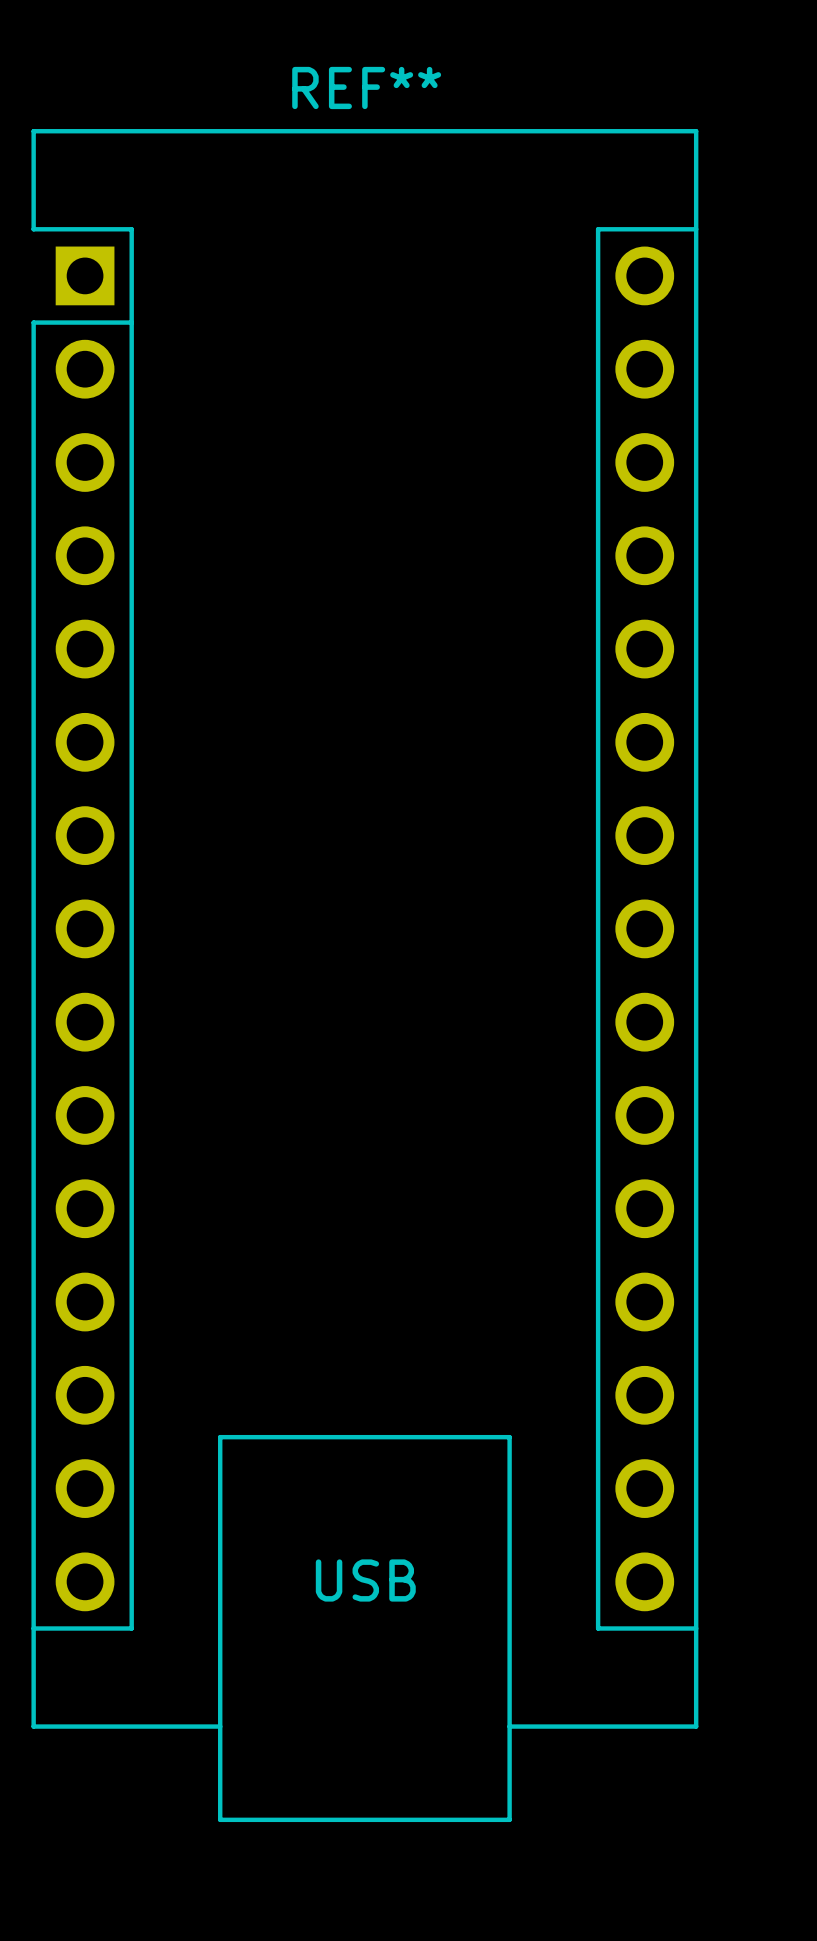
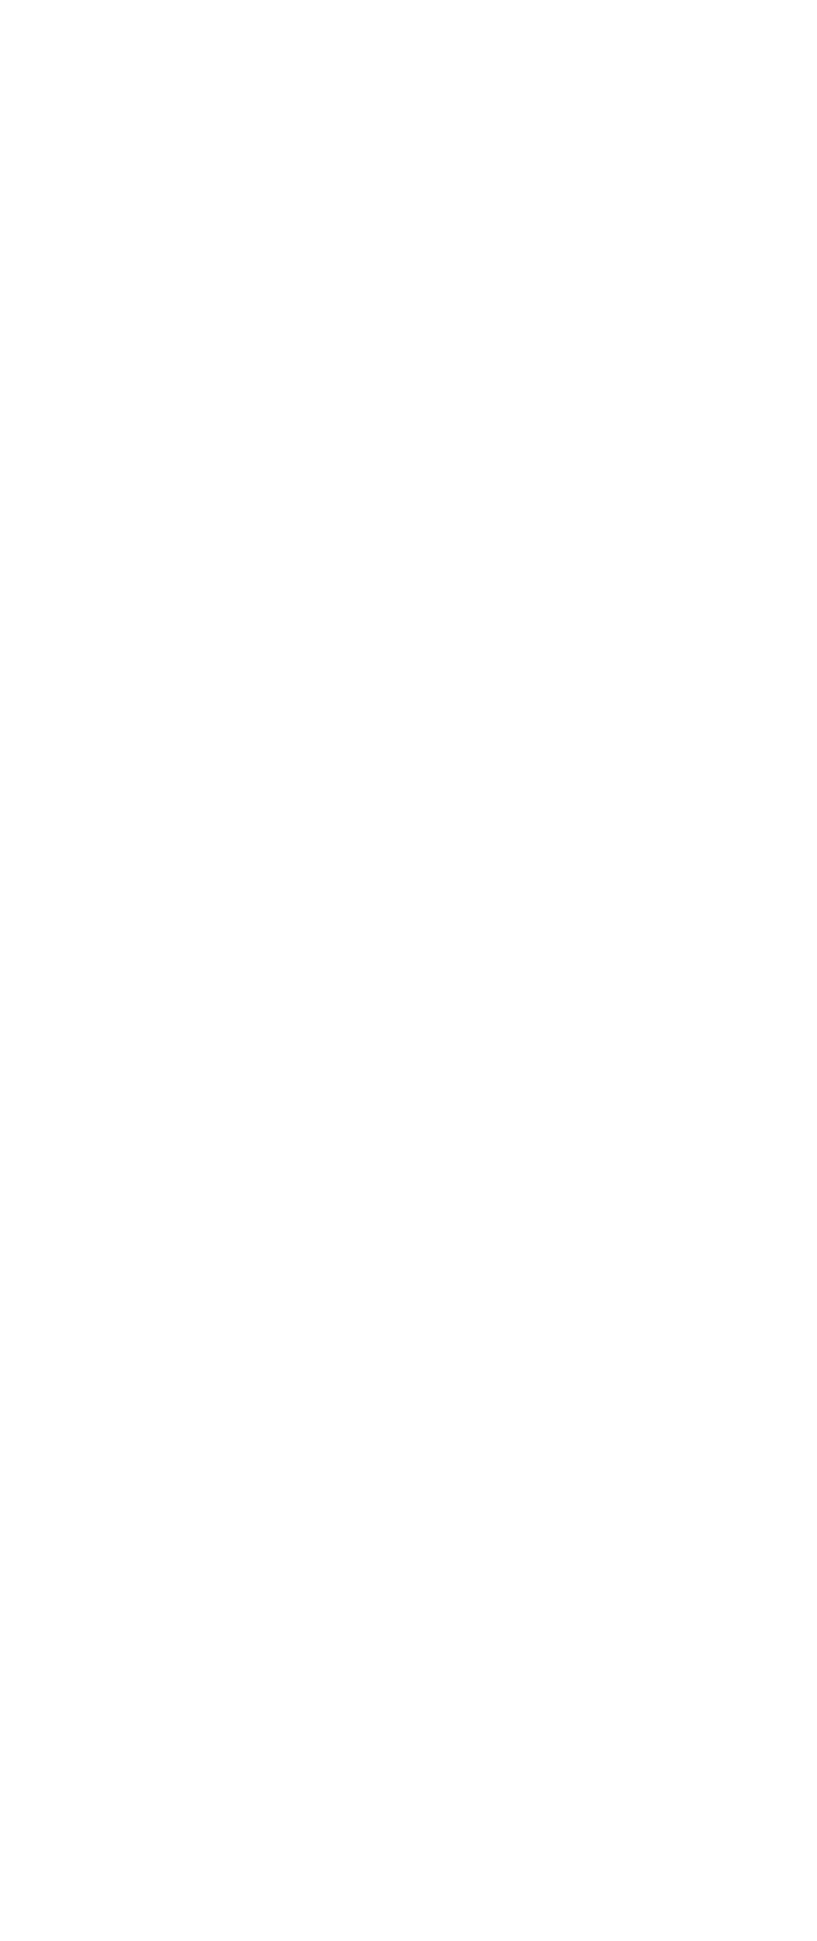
REF**: (364, 975) -> none

